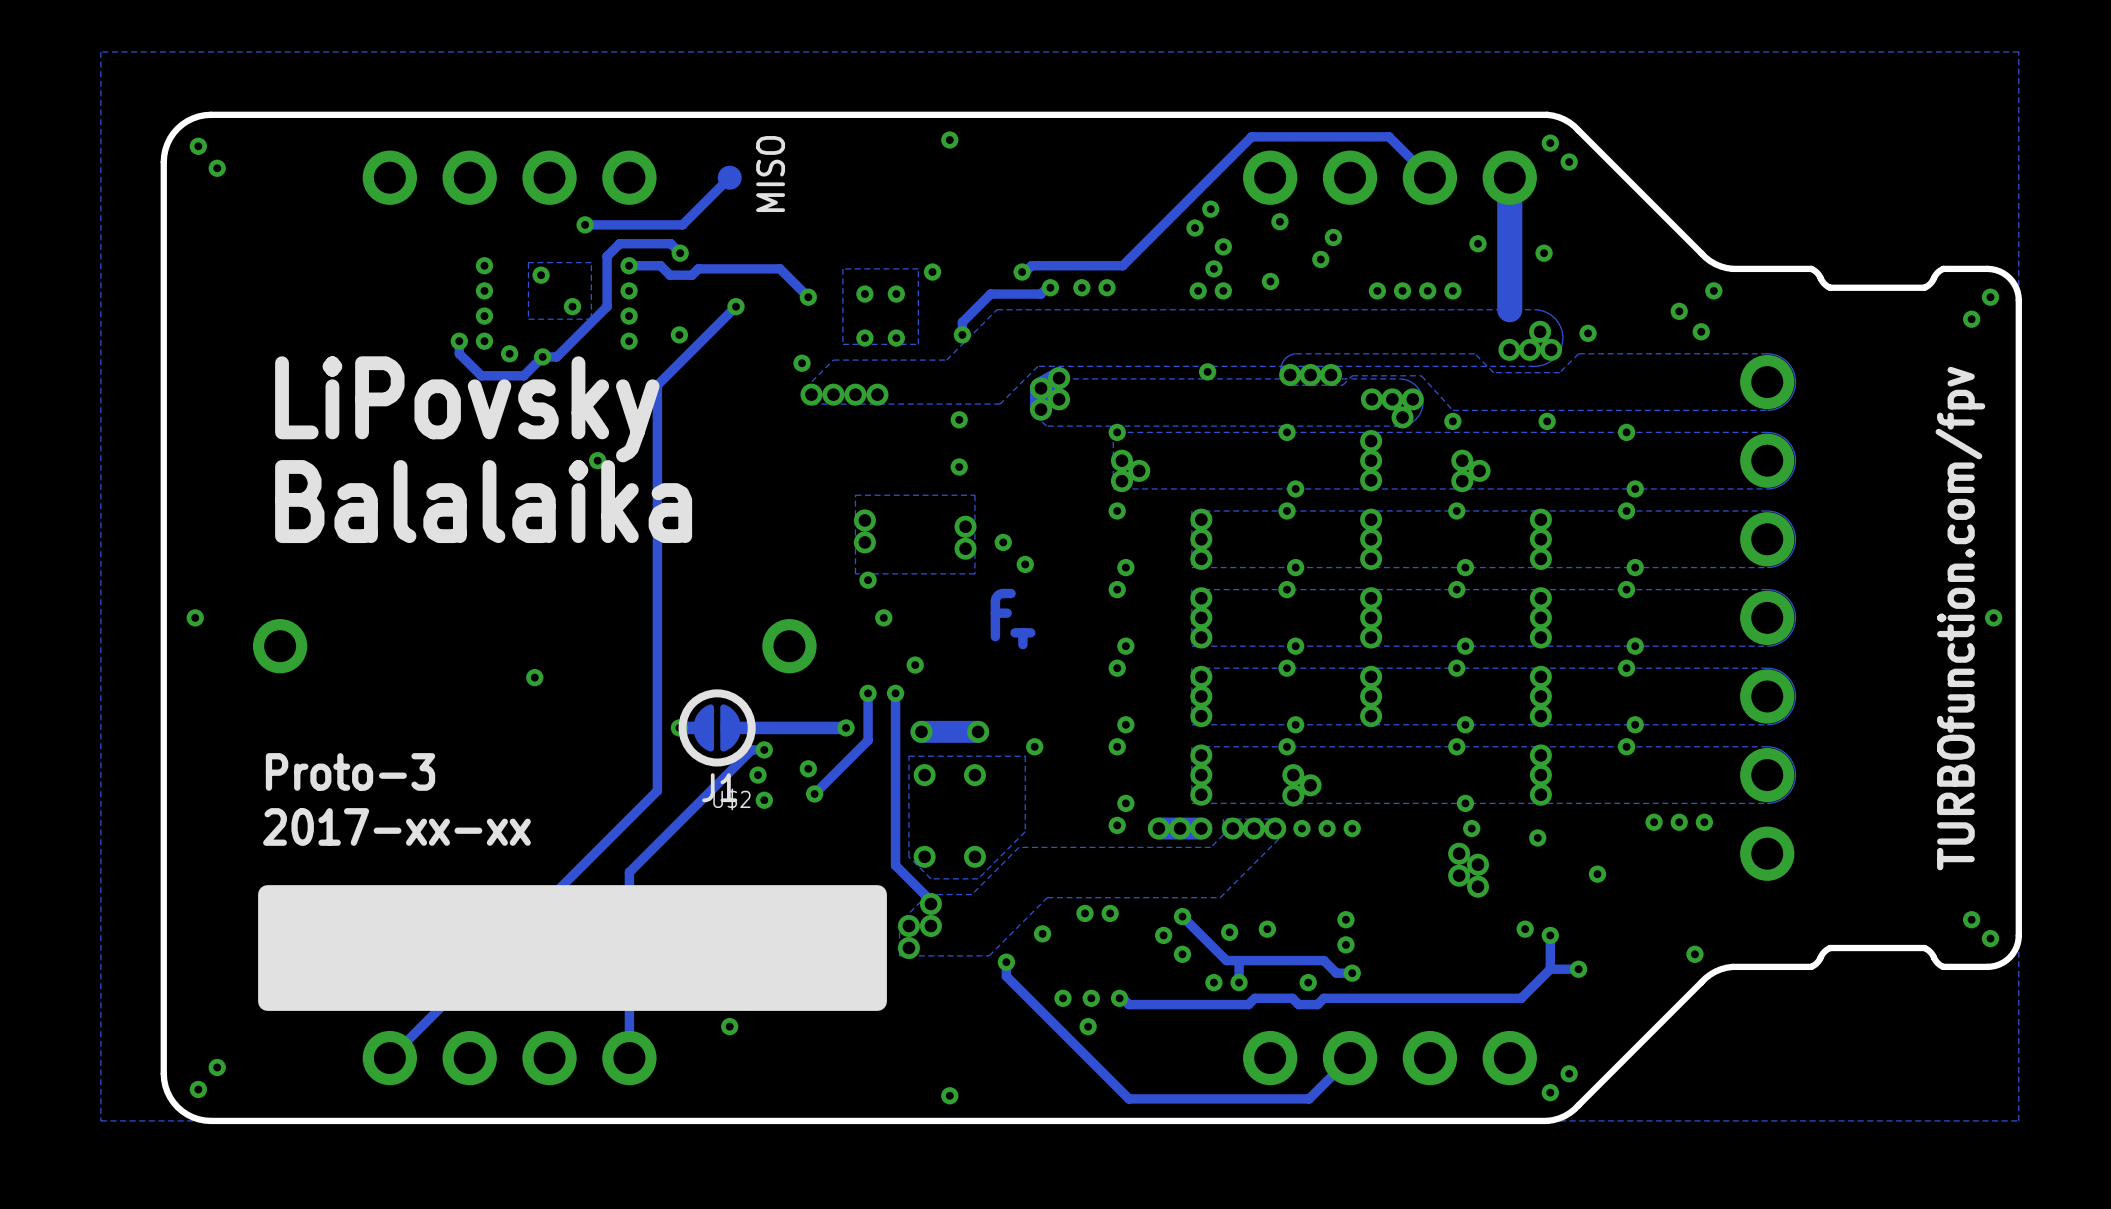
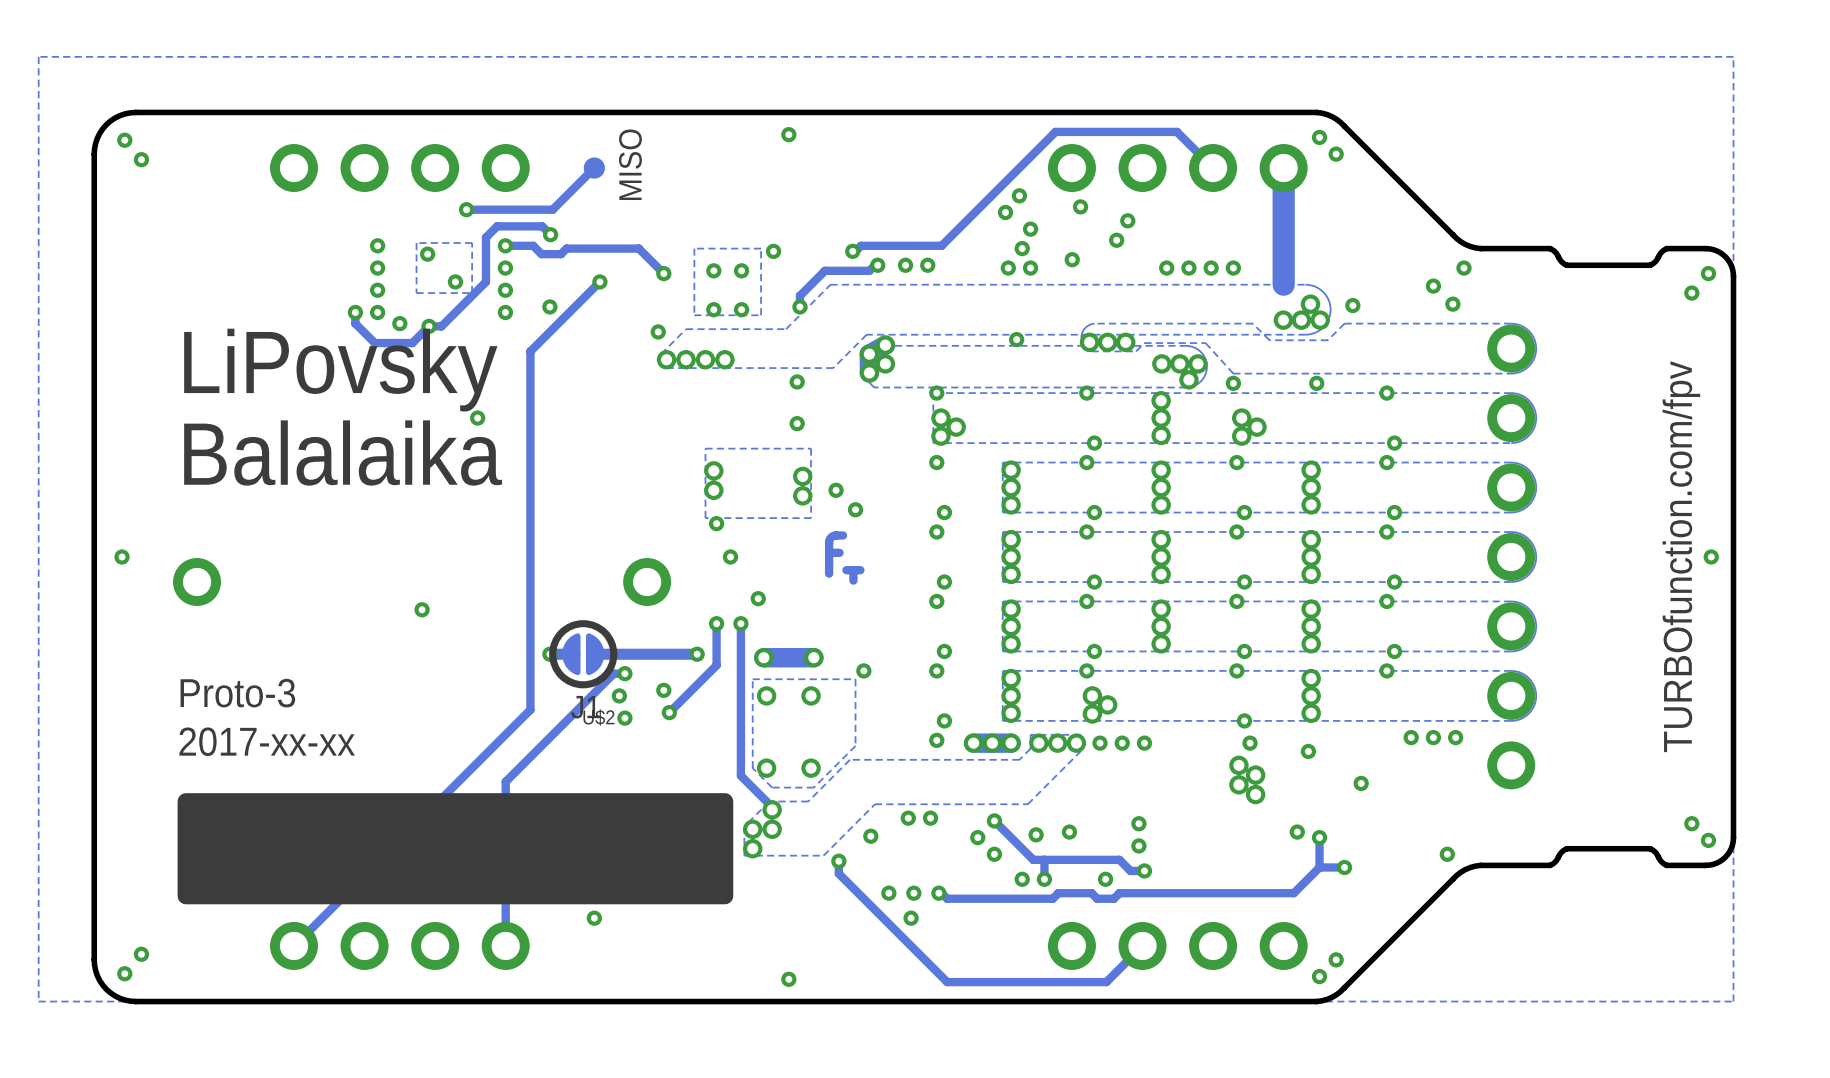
via: (1478, 243) -> none
via: (1544, 253) -> none

